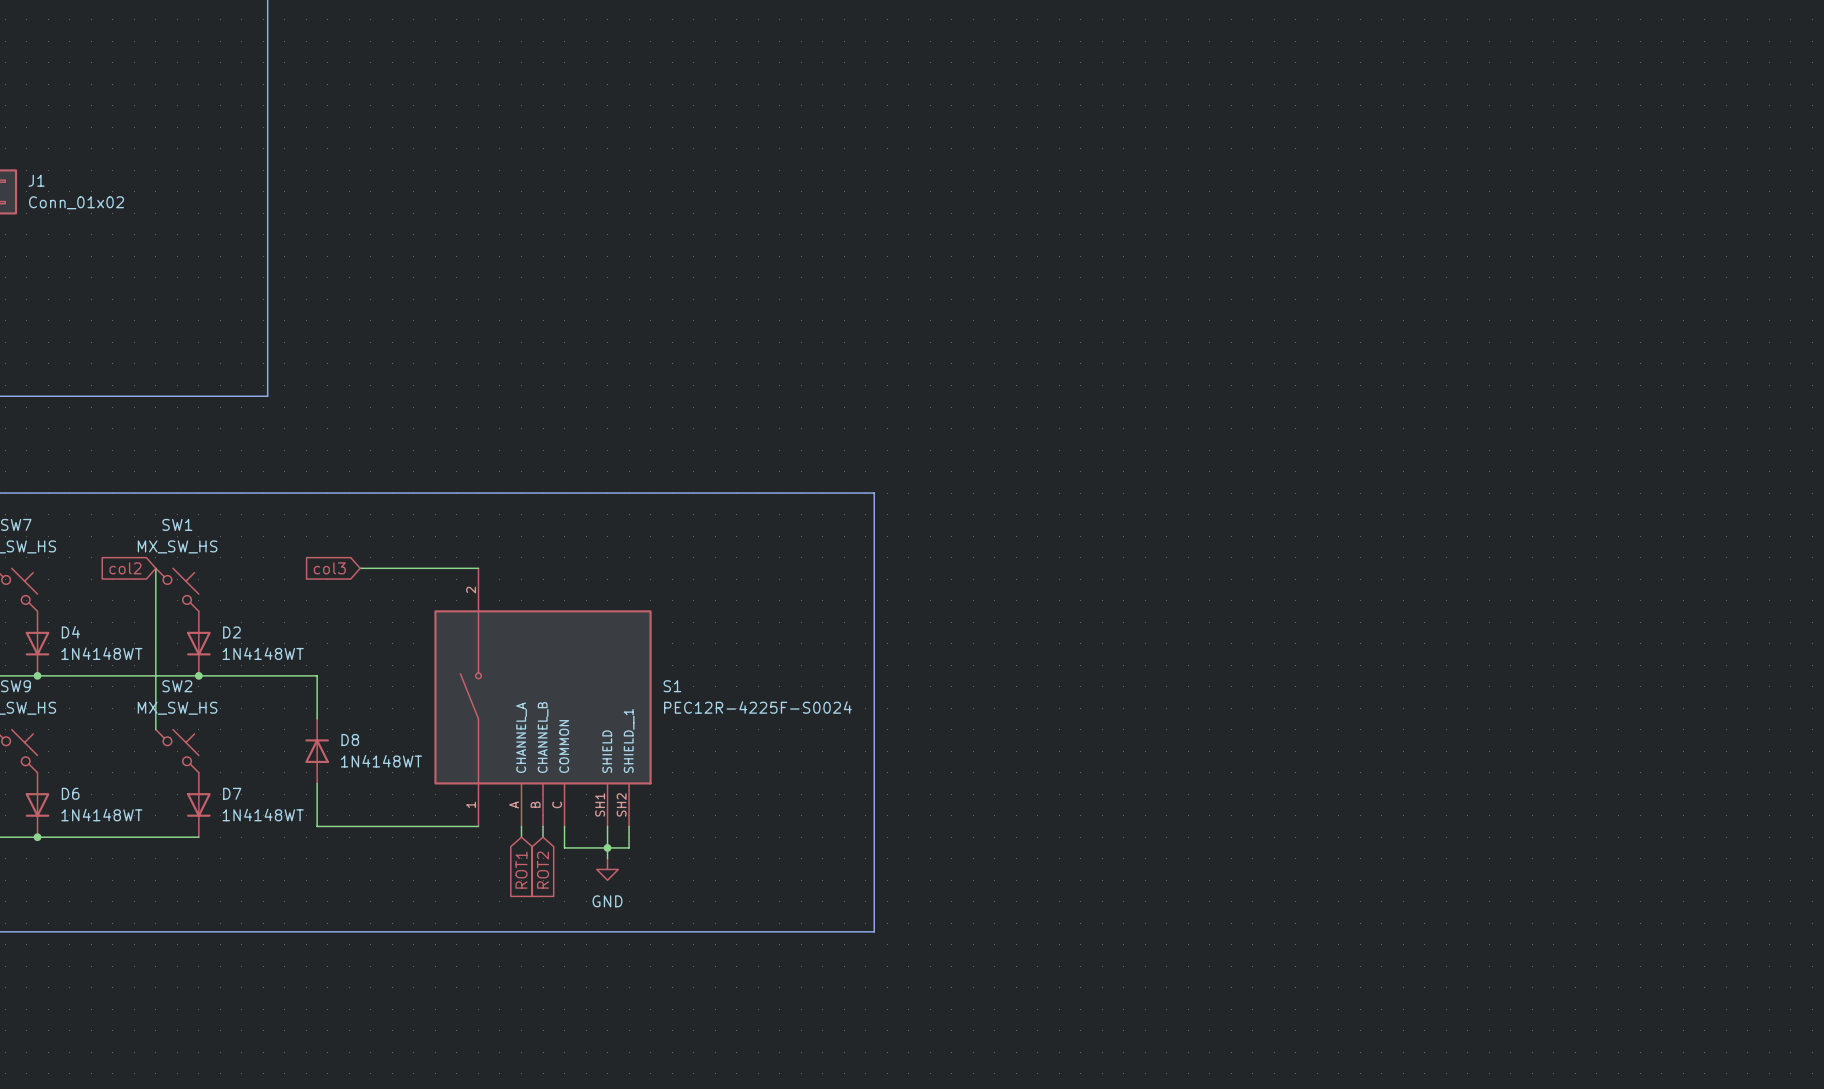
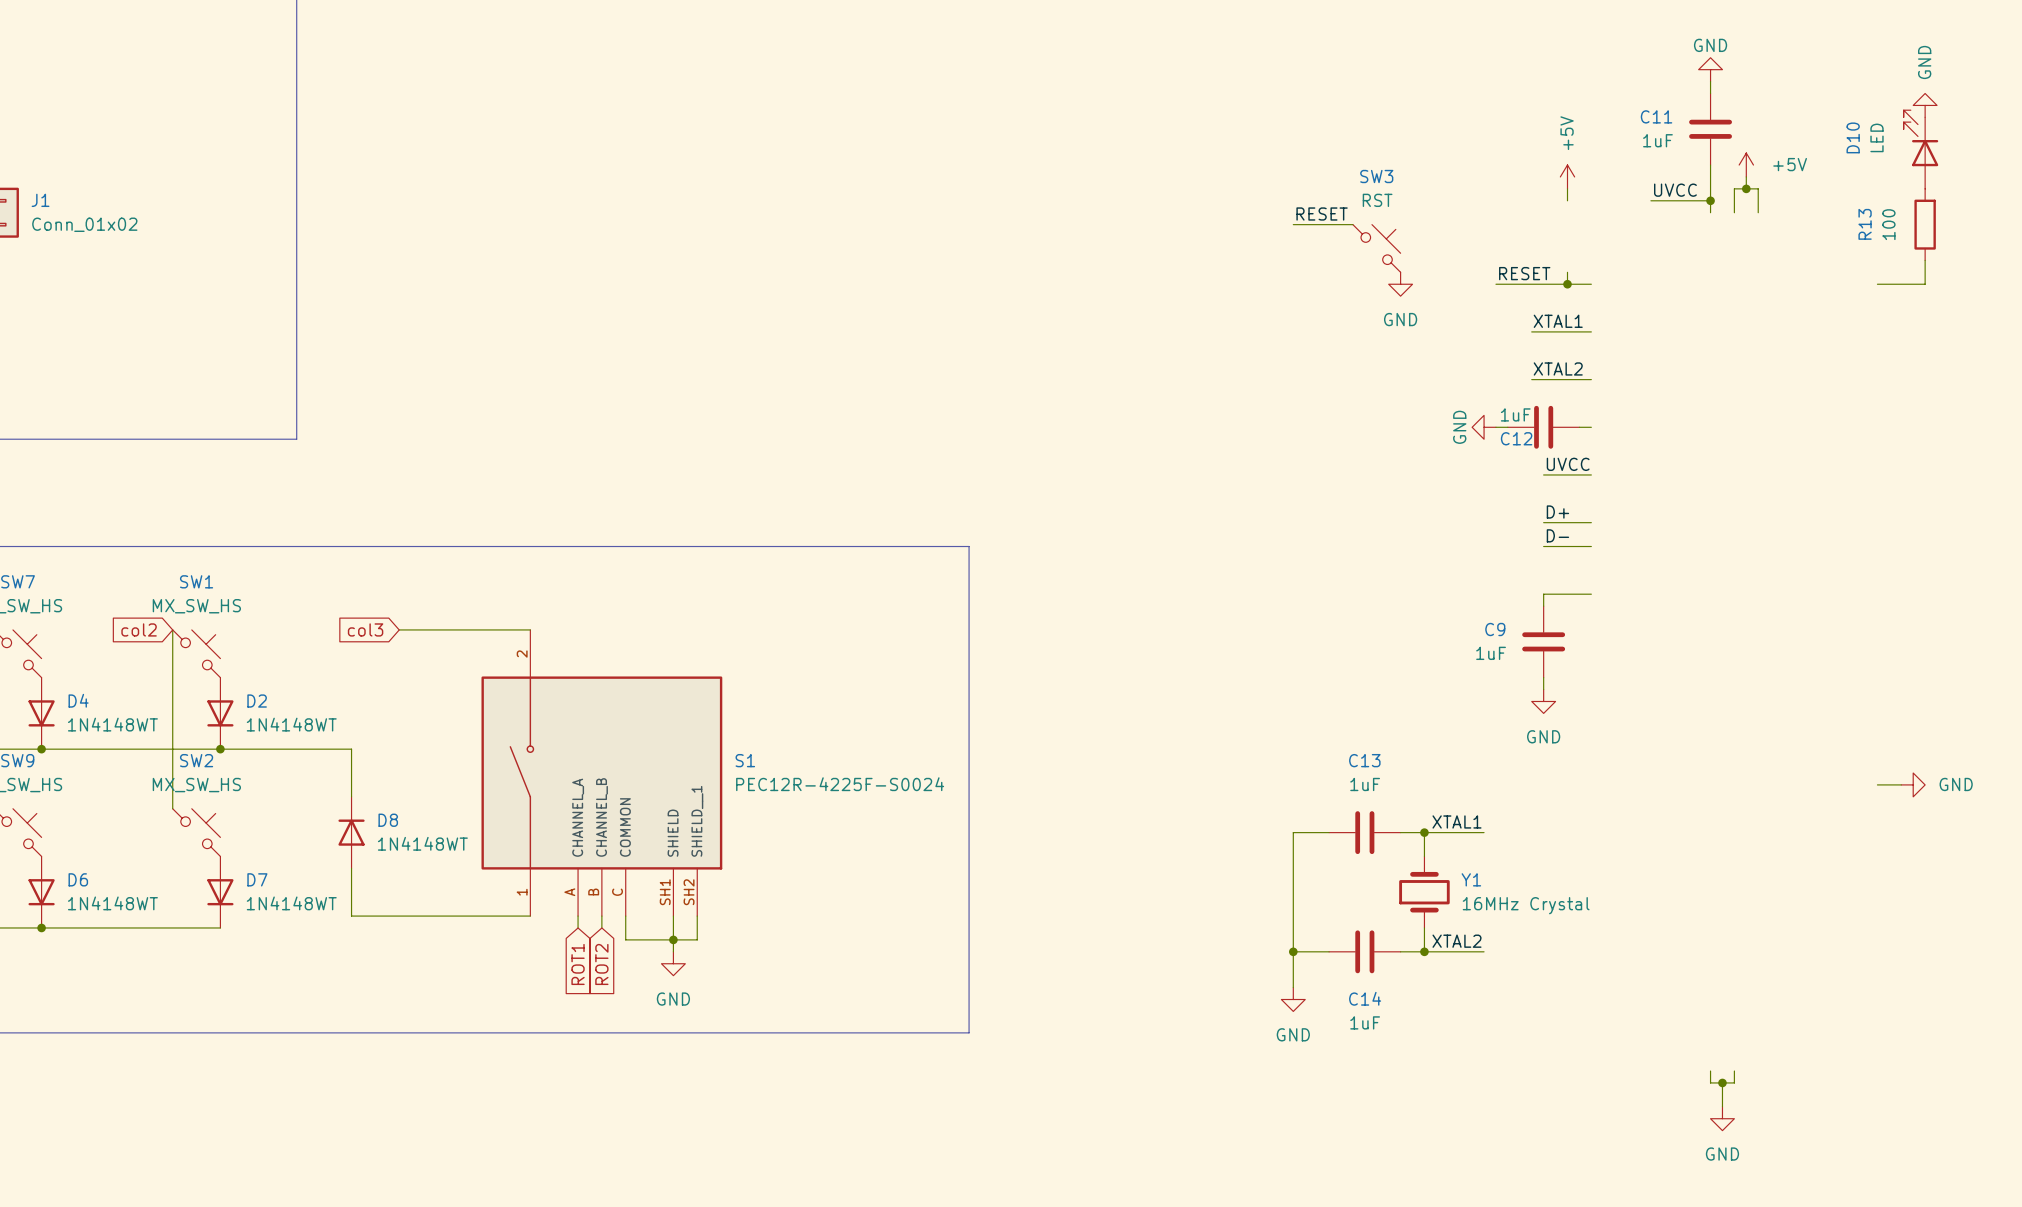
power symbol: none -> GND (1710, 69)
wire: none -> (1710, 81) (1710, 93)
power symbol: none -> GND (1925, 105)
C11: none -> 1uF (1710, 129)
D10: none -> LED (1920, 149)
wire: none -> (1710, 165) (1710, 212)
power symbol: none -> +5V (1746, 165)
power symbol: none -> +5V (1567, 176)
wire: none -> (1746, 176) (1746, 188)
wire: none -> (1567, 188) (1567, 200)
junction: none -> (1746, 188)
label: none -> UVCC (1675, 190)
wire: none -> (1650, 200) (1710, 200)
junction: none -> (1710, 200)
wire: none -> (1734, 212) (1734, 188) (1758, 188) (1758, 212)
label: none -> RESET (1322, 214)
wire: none -> (1293, 224) (1352, 224)
R13: none -> 100 (1925, 224)
SW3: none -> RST (1376, 248)
wire: none -> (1925, 260) (1925, 284) (1877, 284)
wire: none -> (1567, 272) (1567, 284)
label: none -> RESET (1524, 273)
power symbol: none -> GND (1400, 284)
wire: none -> (1495, 284) (1591, 284)
junction: none -> (1567, 284)
label: none -> XTAL1 (1558, 321)
wire: none -> (1531, 331) (1591, 331)
label: none -> XTAL2 (1558, 368)
wire: none -> (1531, 379) (1591, 379)
power symbol: none -> GND (1484, 427)
wire: none -> (1495, 427) (1507, 427)
C12: none -> 1uF (1543, 427)
wire: none -> (1579, 427) (1591, 427)
label: none -> UVCC (1568, 464)
wire: none -> (1543, 474) (1591, 474)
label: none -> D+ (1557, 512)
wire: none -> (1543, 522) (1591, 522)
label: none -> D- (1557, 535)
wire: none -> (1543, 546) (1591, 546)
wire: none -> (1591, 594) (1543, 594) (1543, 606)
C9: none -> 1uF (1543, 641)
wire: none -> (1543, 677) (1543, 689)
power symbol: none -> GND (1543, 701)
wire: none -> (1877, 784) (1901, 784)
power symbol: none -> GND (1913, 784)
label: none -> XTAL1 (1456, 821)
wire: none -> (1329, 832) (1293, 832) (1293, 987)
C13: none -> 1uF (1364, 832)
wire: none -> (1400, 832) (1484, 832)
wire: none -> (1424, 832) (1424, 856)
junction: none -> (1424, 832)
Y1: none -> 16MHz Crystal (1424, 892)
wire: none -> (1424, 927) (1424, 951)
label: none -> XTAL2 (1456, 941)
wire: none -> (1293, 951) (1329, 951)
junction: none -> (1293, 951)
C14: none -> 1uF (1364, 951)
wire: none -> (1400, 951) (1484, 951)
junction: none -> (1424, 951)
power symbol: none -> GND (1293, 999)
wire: none -> (1710, 1071) (1710, 1082) (1734, 1082) (1734, 1071)
wire: none -> (1722, 1082) (1722, 1106)
junction: none -> (1722, 1082)
power symbol: none -> GND (1722, 1118)

